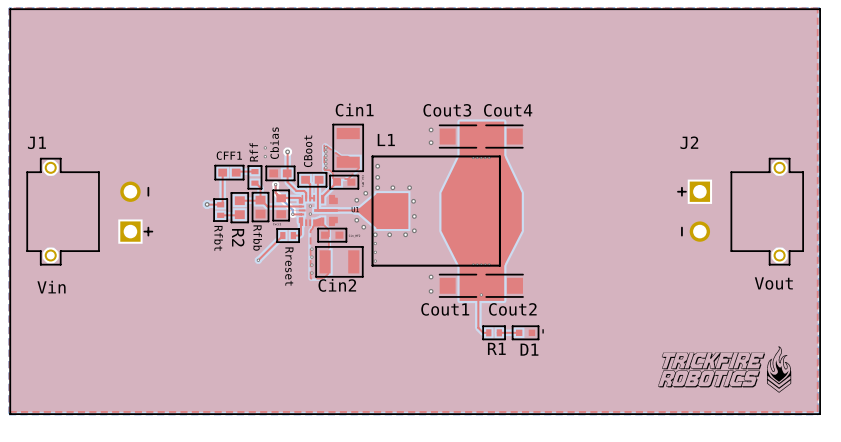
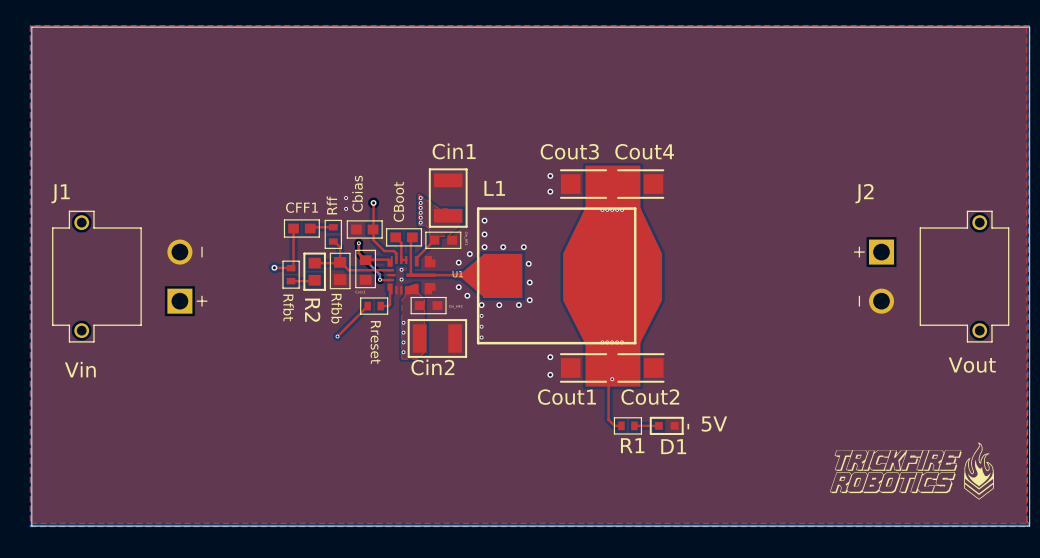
text: none -> 5V (714, 424)

